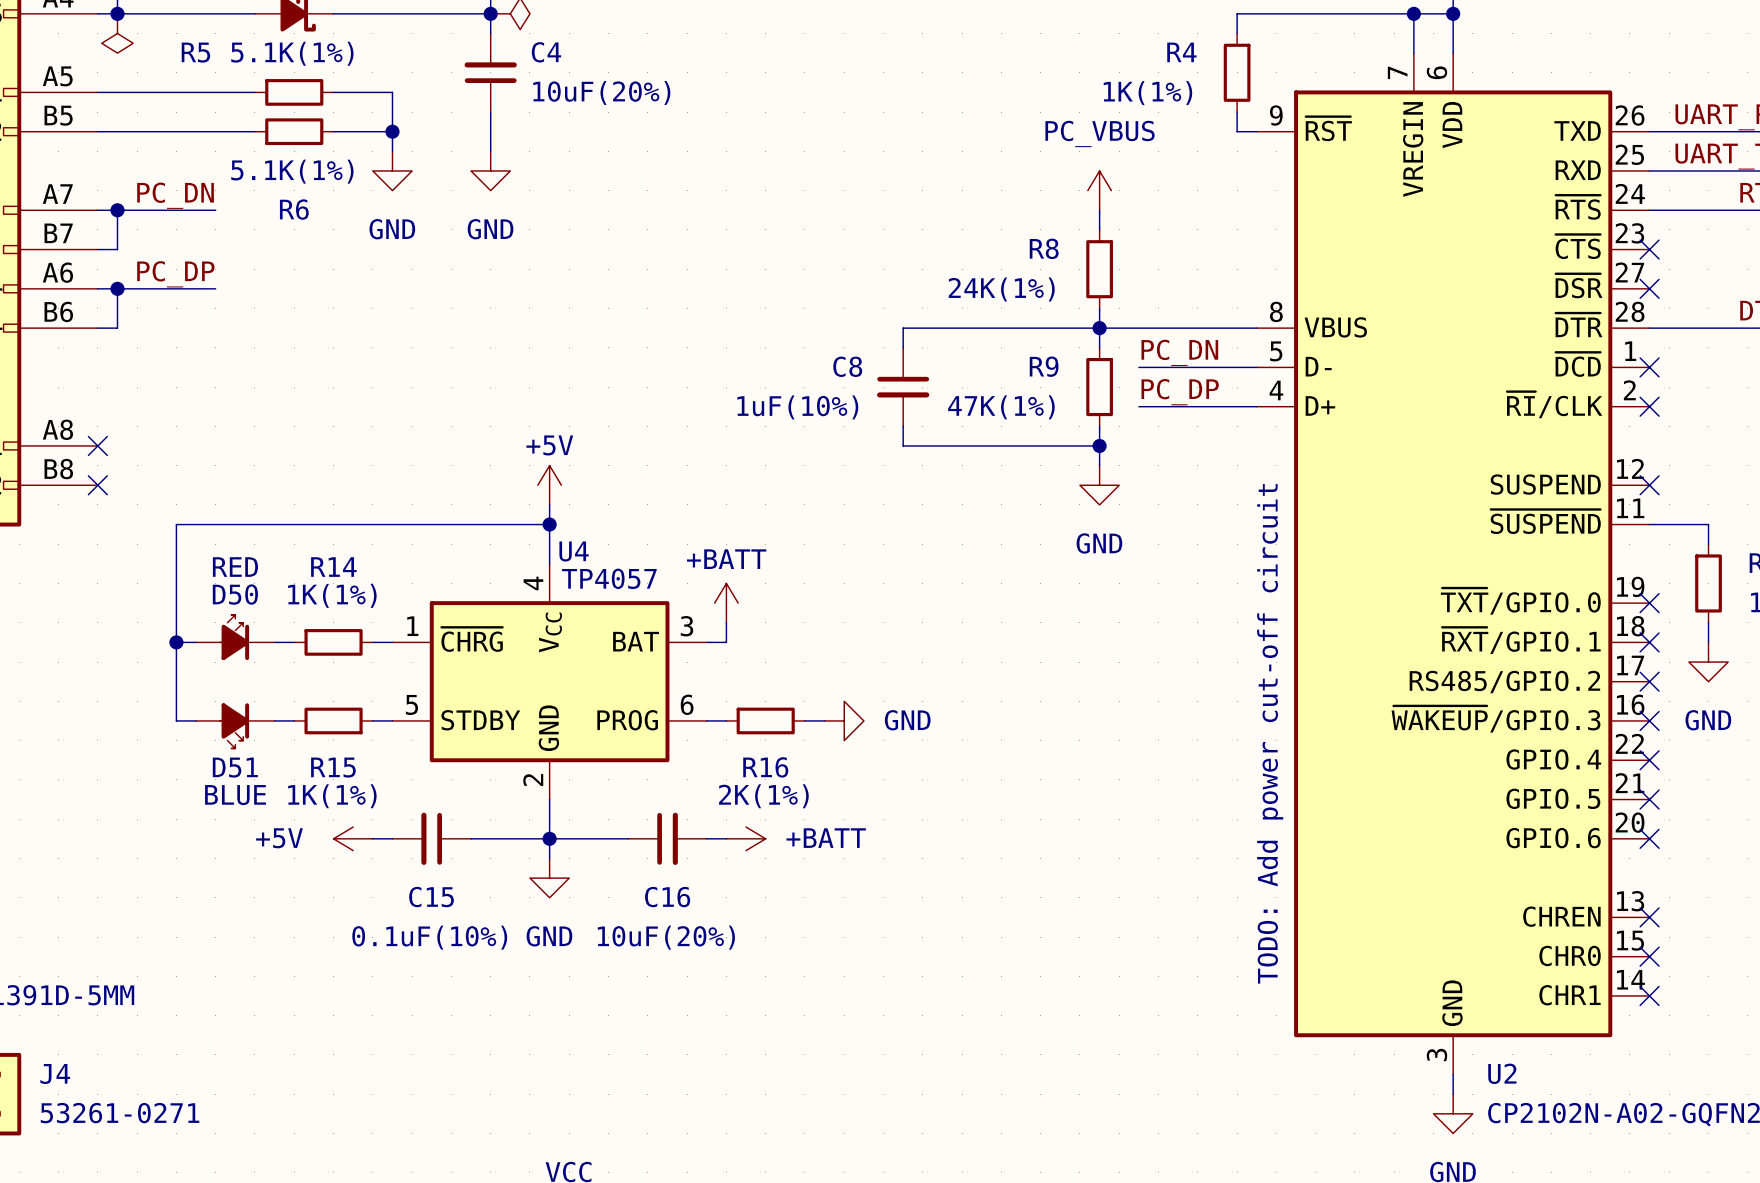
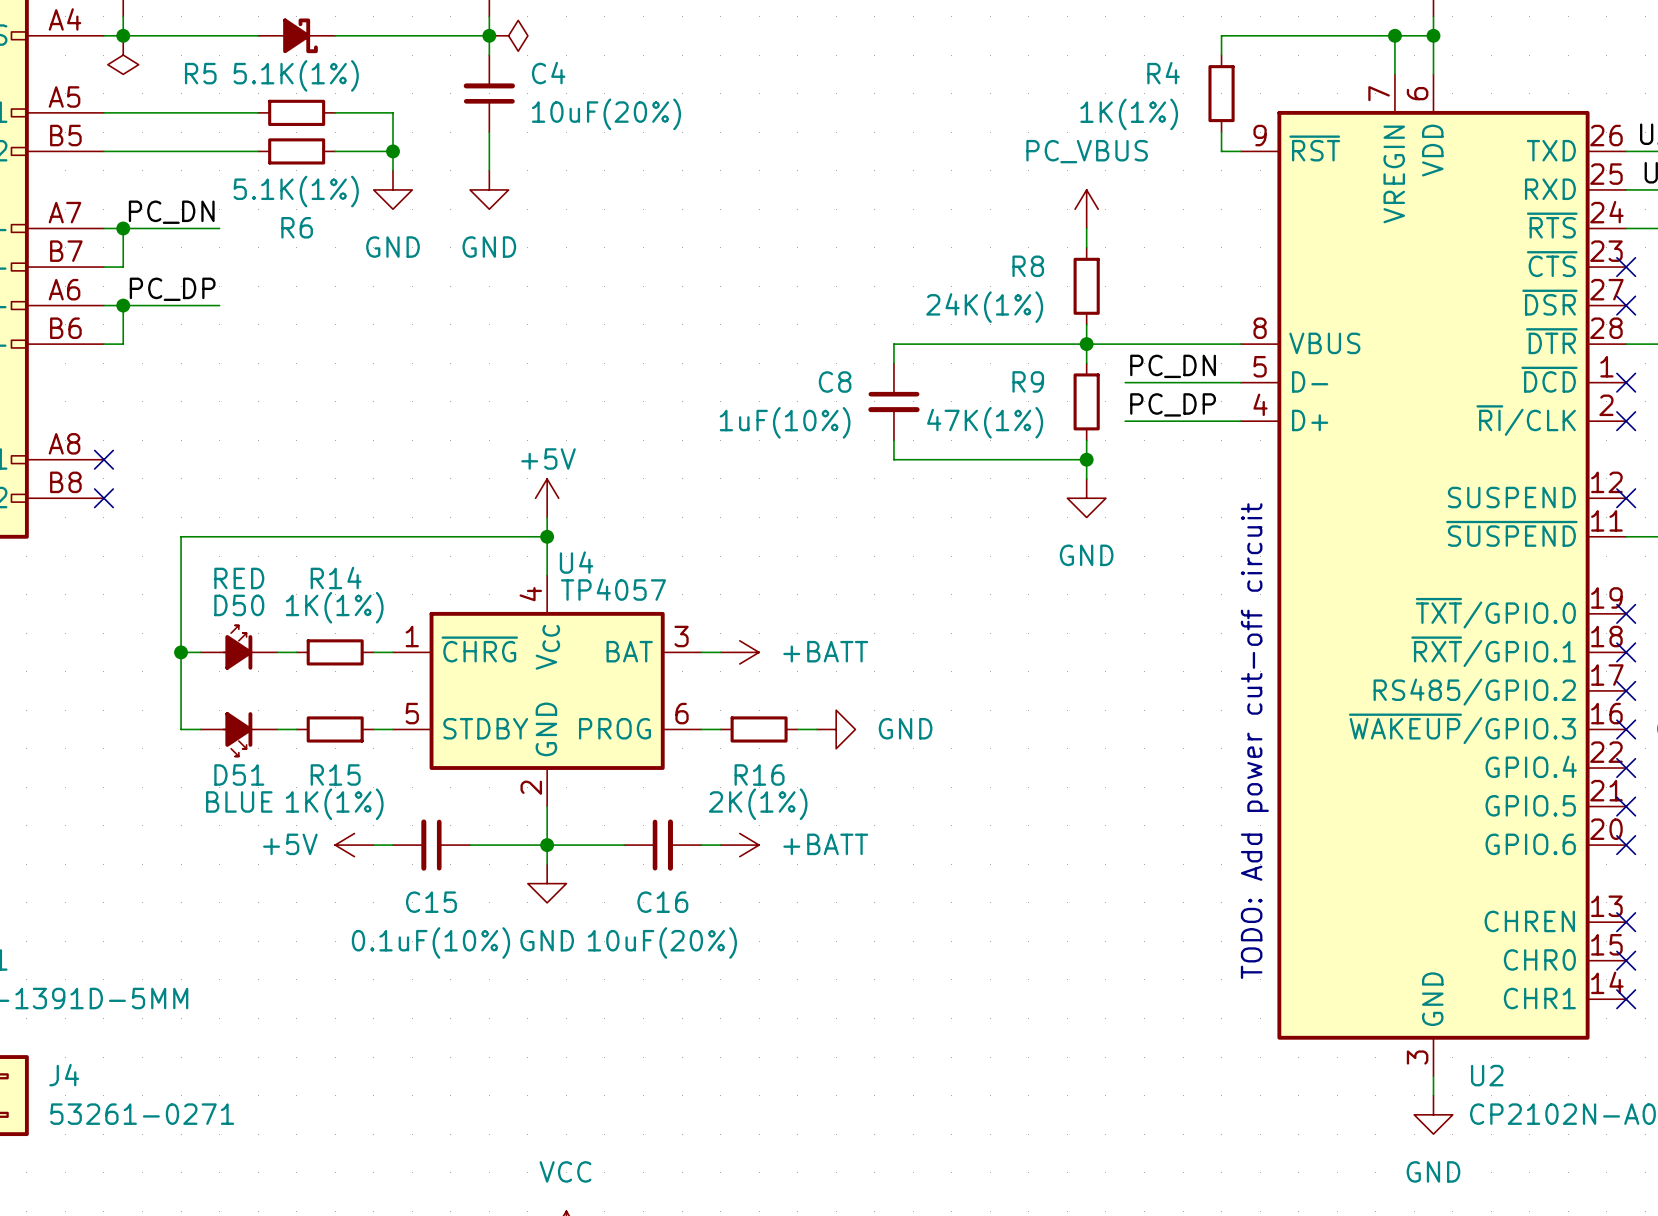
power symbol text position: +BATT (726, 559) -> +BATT (825, 651)
power symbol rotation: 0° (726, 603) -> 90° clockwise (739, 652)
power symbol position: +BATT (726, 603) -> +BATT (739, 652)
wire: (726, 622) (726, 642) -> none

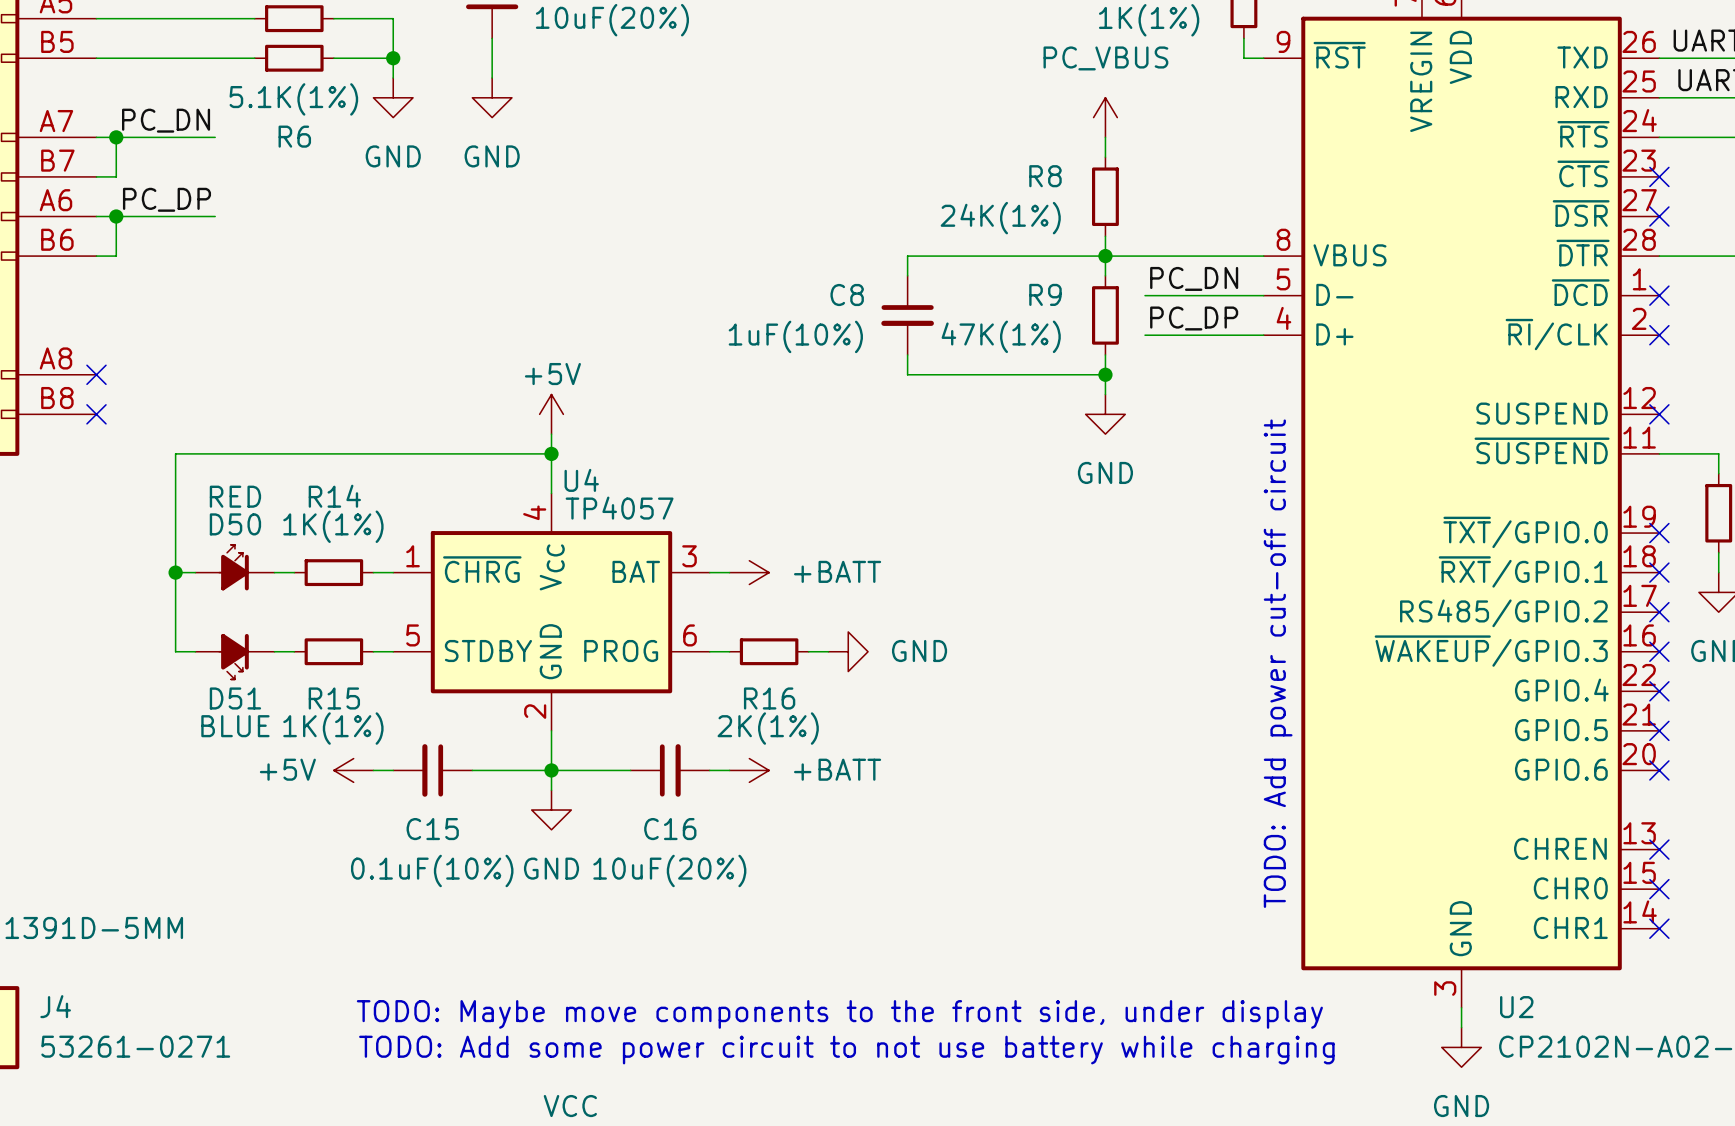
text: none -> TODO: Maybe move components to the front side, under display (839, 1014)
text: none -> TODO: Add some power circuit to not use battery while charging (846, 1050)

